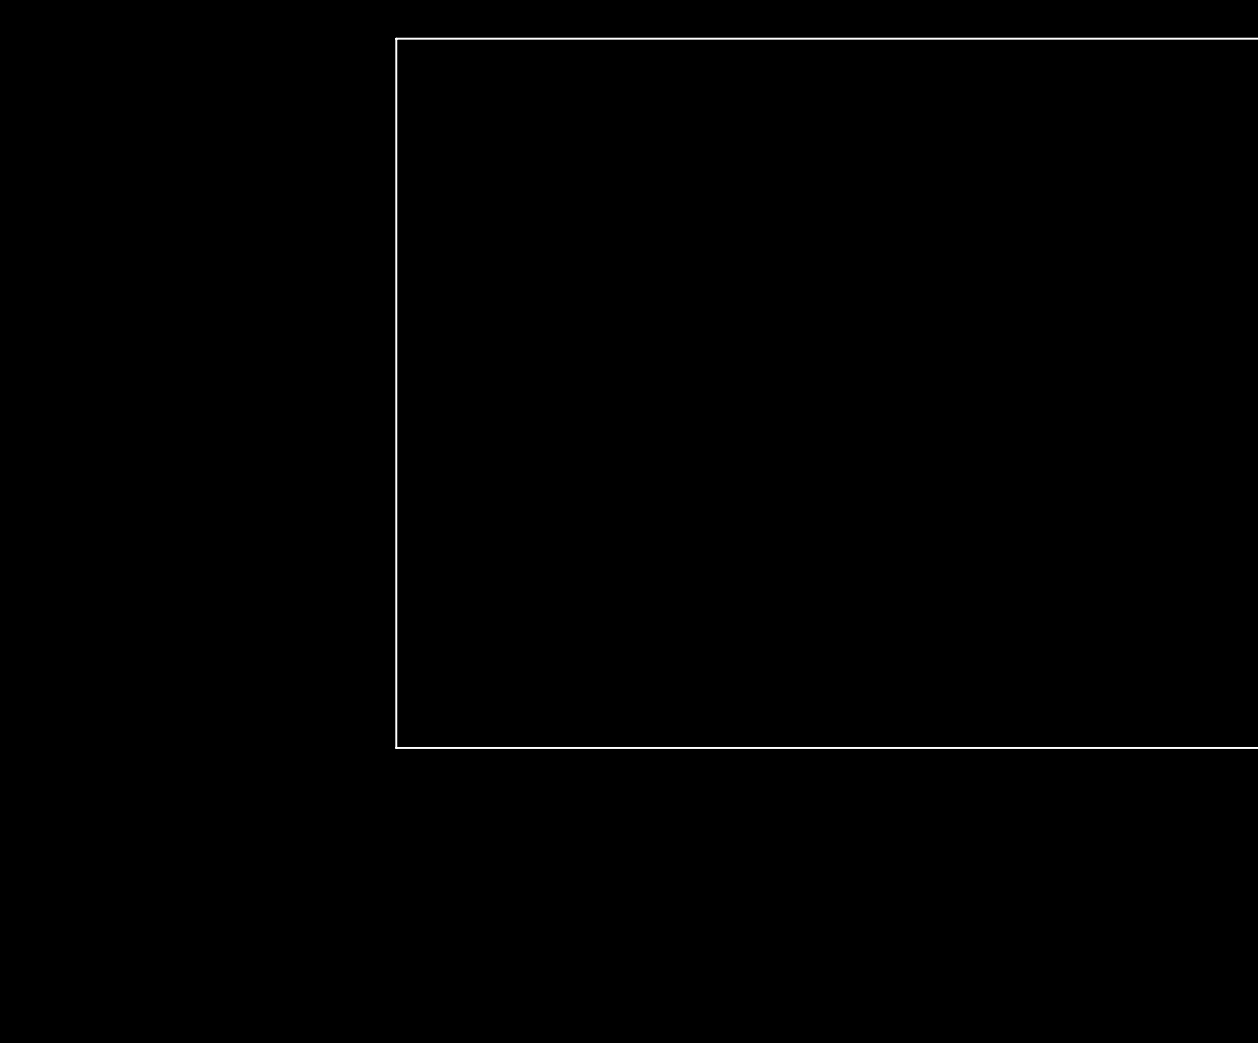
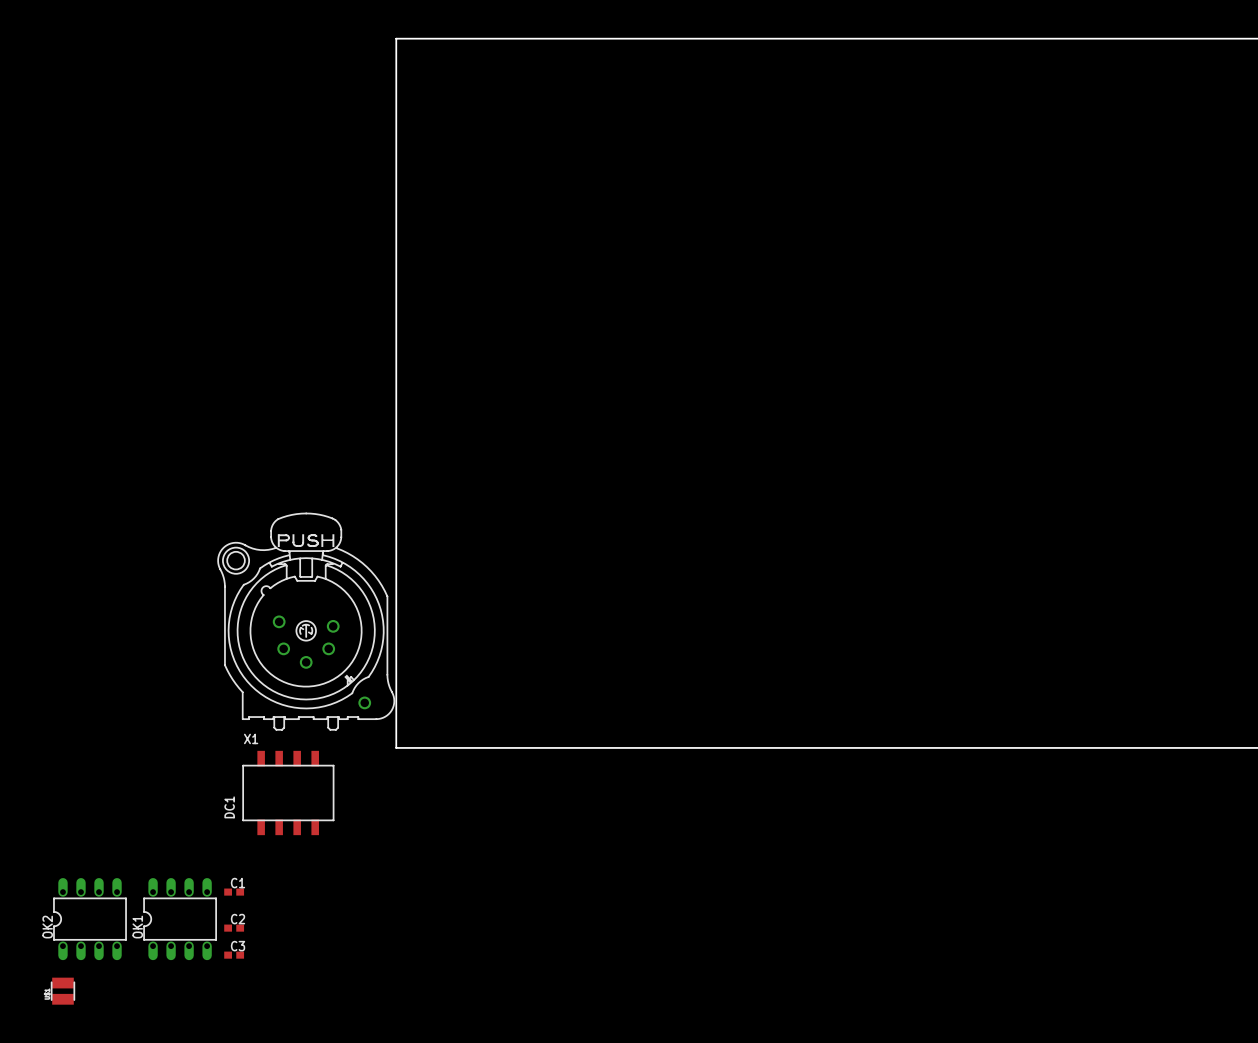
X1: none -> (306, 621)
DC1: none -> (288, 792)
C1: none -> (234, 892)
OK2: none -> (90, 919)
OK1: none -> (180, 919)
C2: none -> (234, 928)
C3: none -> (234, 955)
part: none -> (62, 991)

